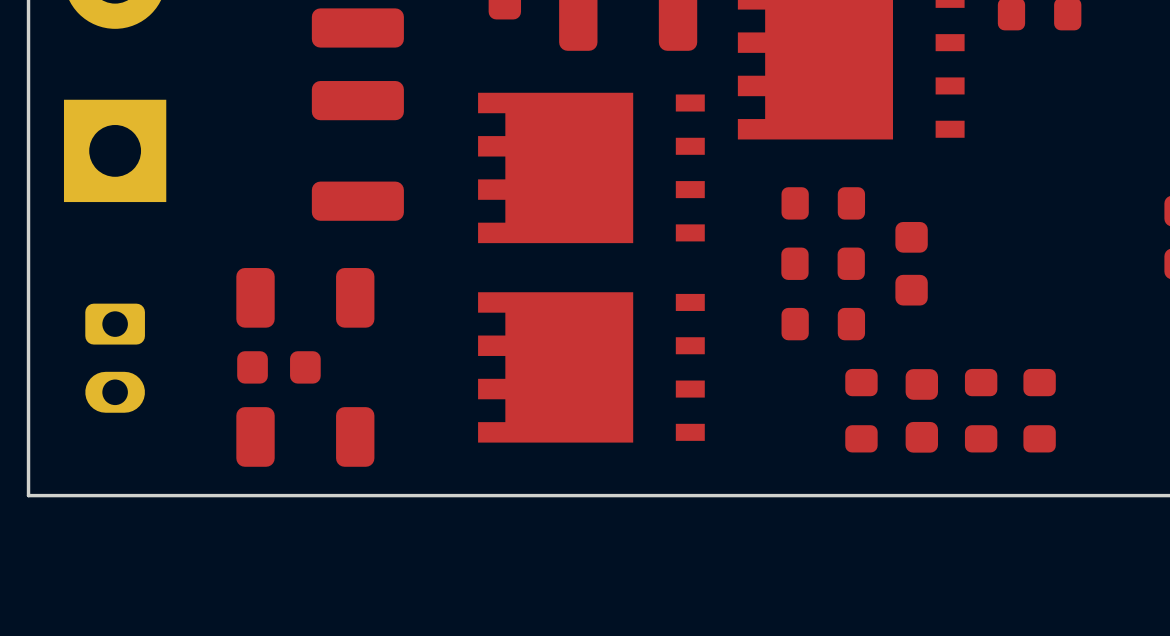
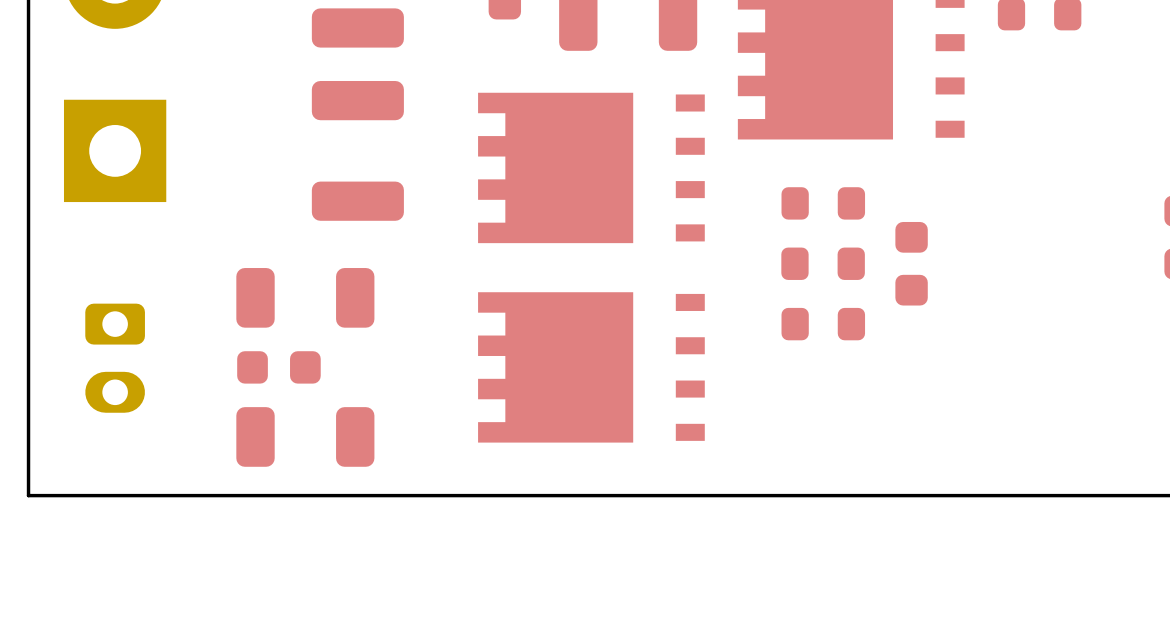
part: (861, 410) -> none
part: (921, 410) -> none
part: (981, 410) -> none
part: (1039, 410) -> none

